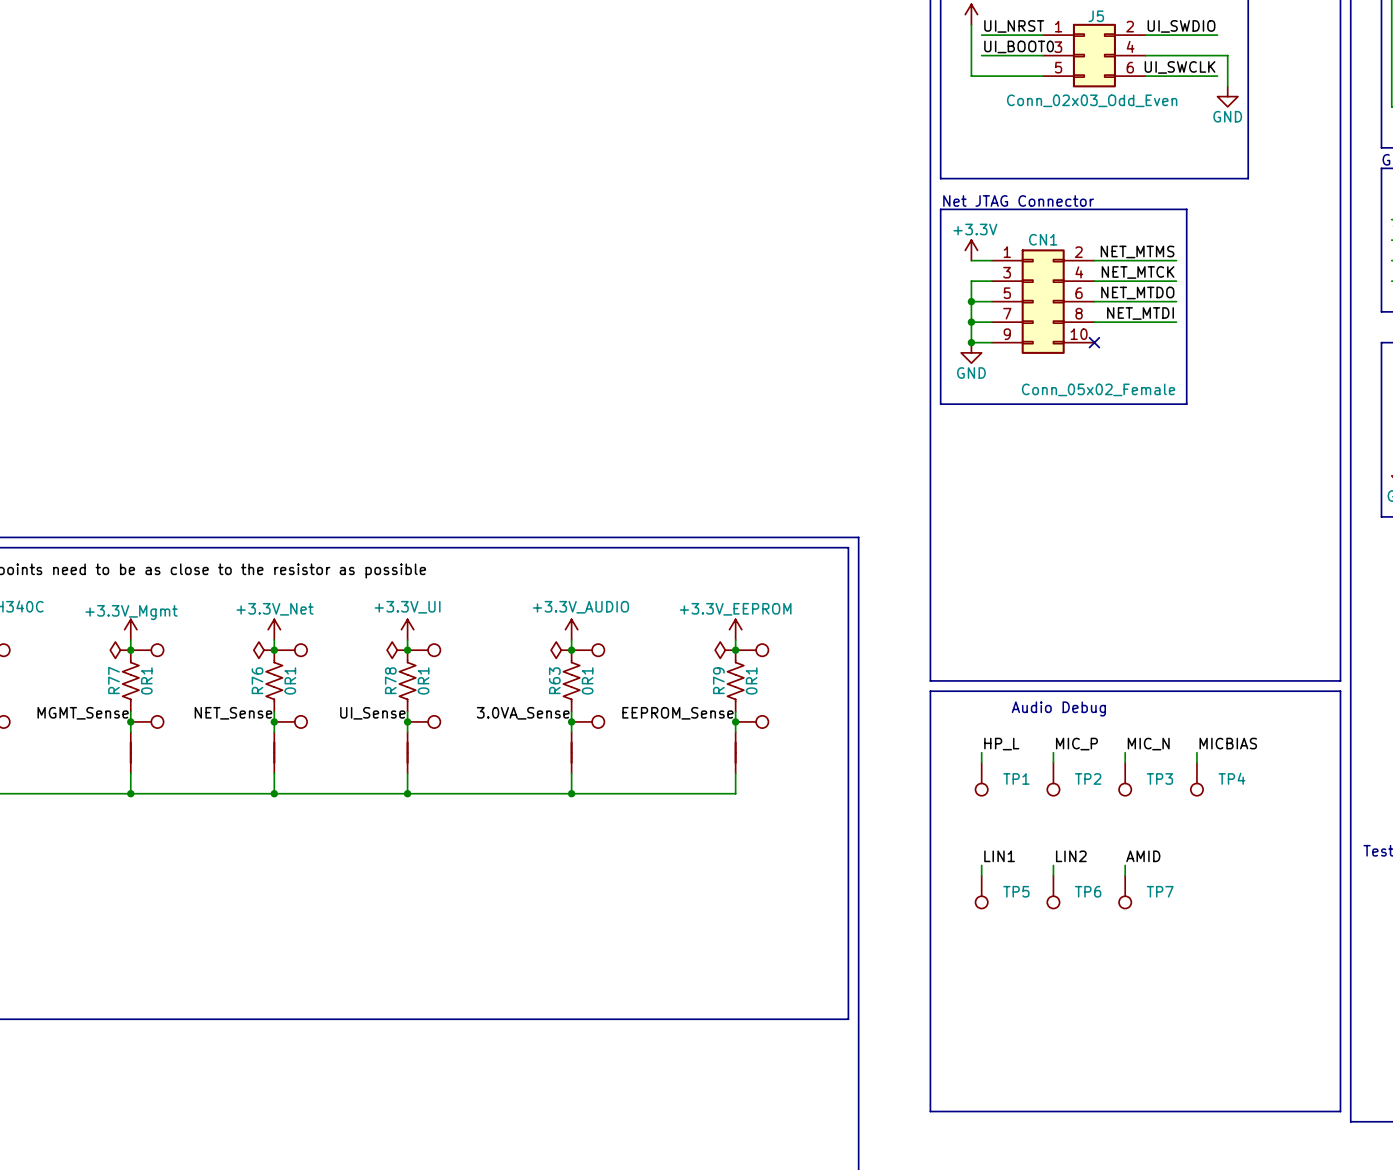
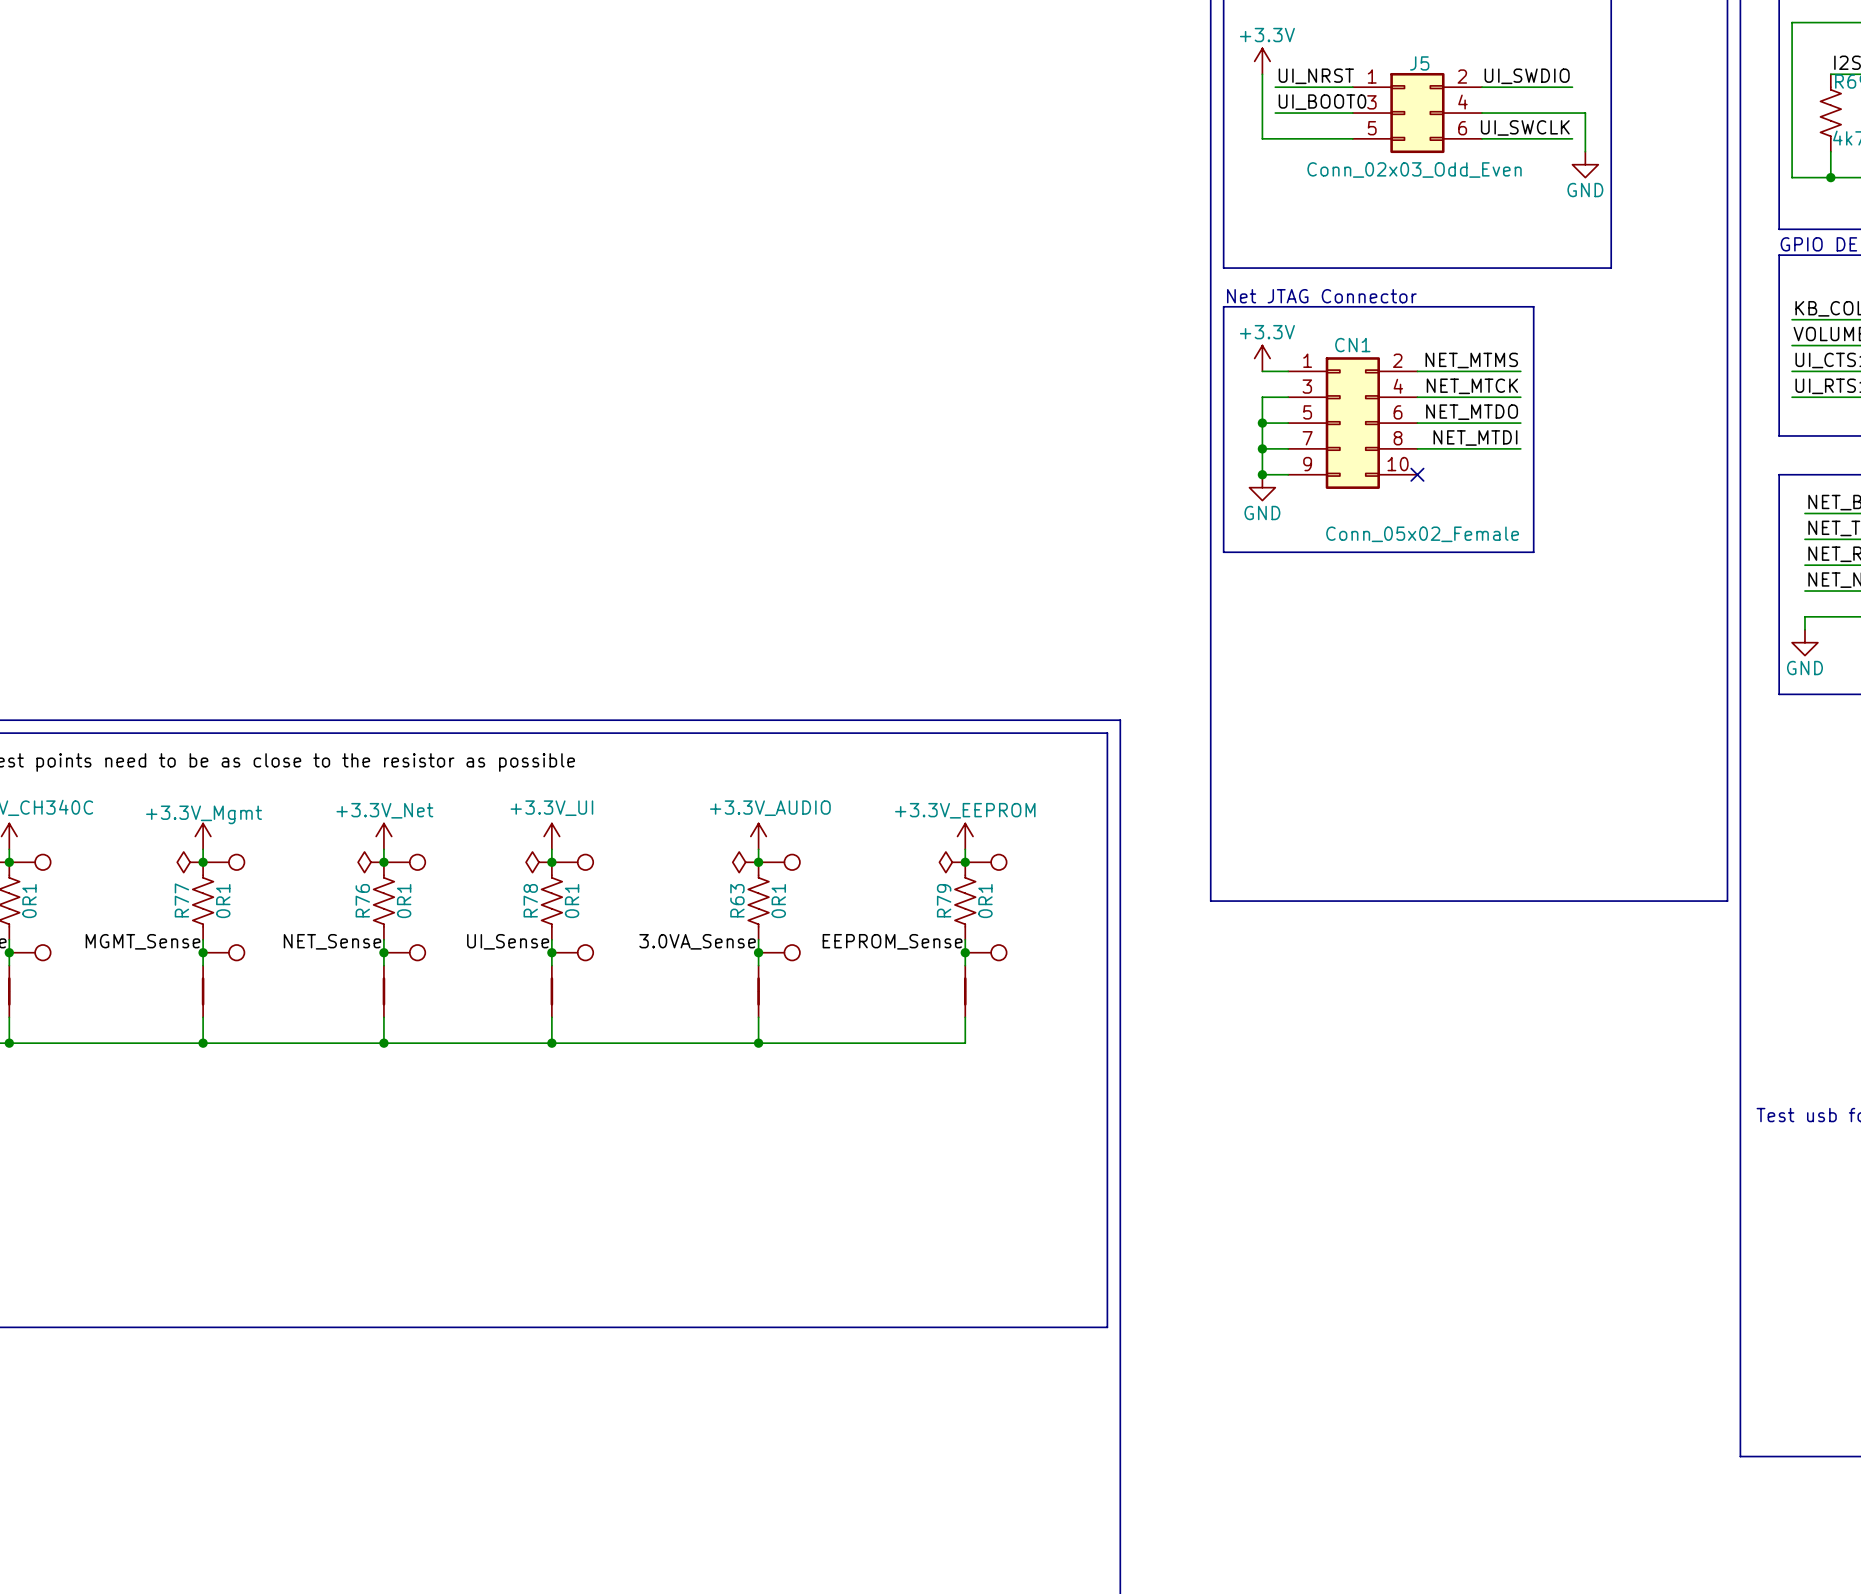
line: (930, 691) (1340, 691) (1340, 1111) (930, 1111) (930, 691) -> none
text: Audio Debug (1058, 708) -> none
label: MICBIAS (1228, 743) -> none
label: HP_L (1001, 744) -> none
label: MIC_P (1076, 744) -> none
label: MIC_N (1148, 744) -> none
wire: (981, 752) (981, 762) -> none
wire: (1053, 752) (1053, 762) -> none
wire: (1125, 752) (1125, 762) -> none
wire: (1196, 752) (1196, 762) -> none
TP1: (981, 779) -> none
TP2: (1053, 779) -> none
TP3: (1125, 779) -> none
TP4: (1196, 779) -> none
label: LIN1 (999, 856) -> none
label: LIN2 (1071, 856) -> none
label: AMID (1143, 856) -> none
wire: (981, 865) (981, 875) -> none
wire: (1053, 865) (1053, 875) -> none
wire: (1125, 865) (1125, 875) -> none
TP5: (981, 892) -> none
TP6: (1053, 892) -> none
TP7: (1125, 892) -> none

